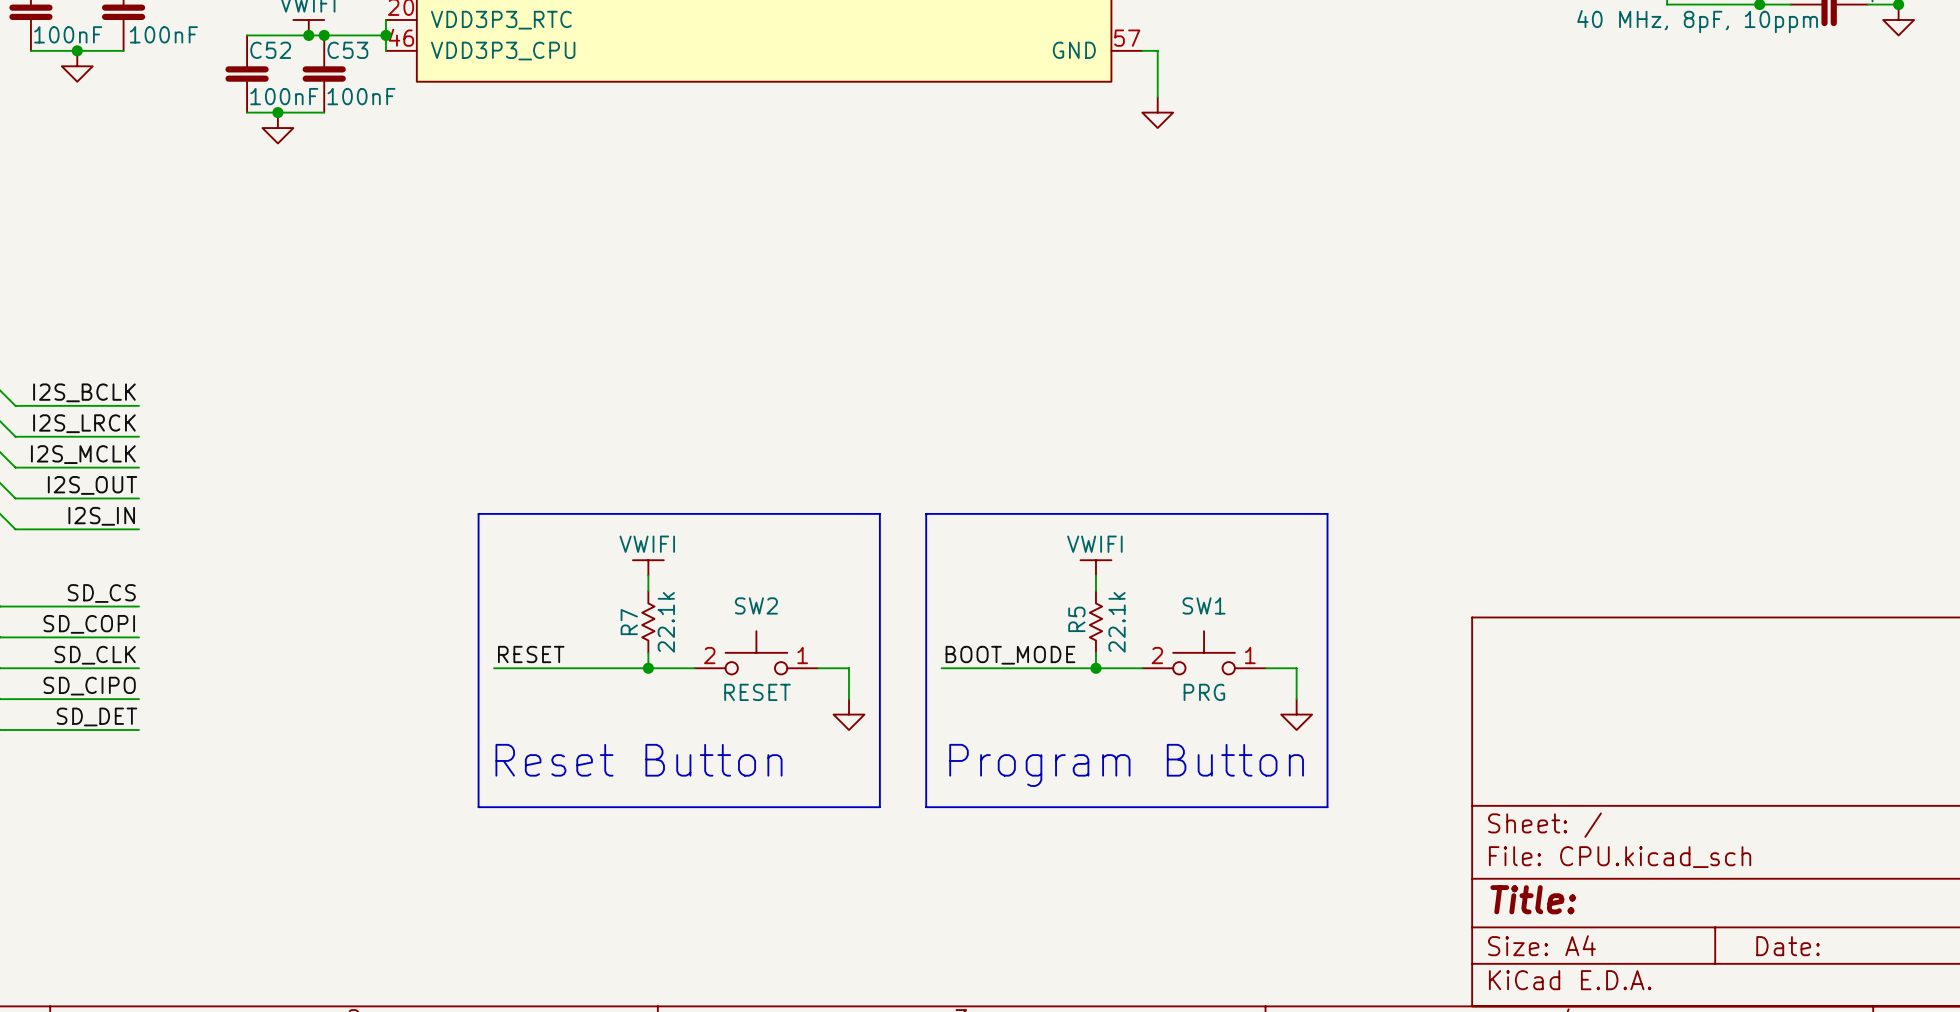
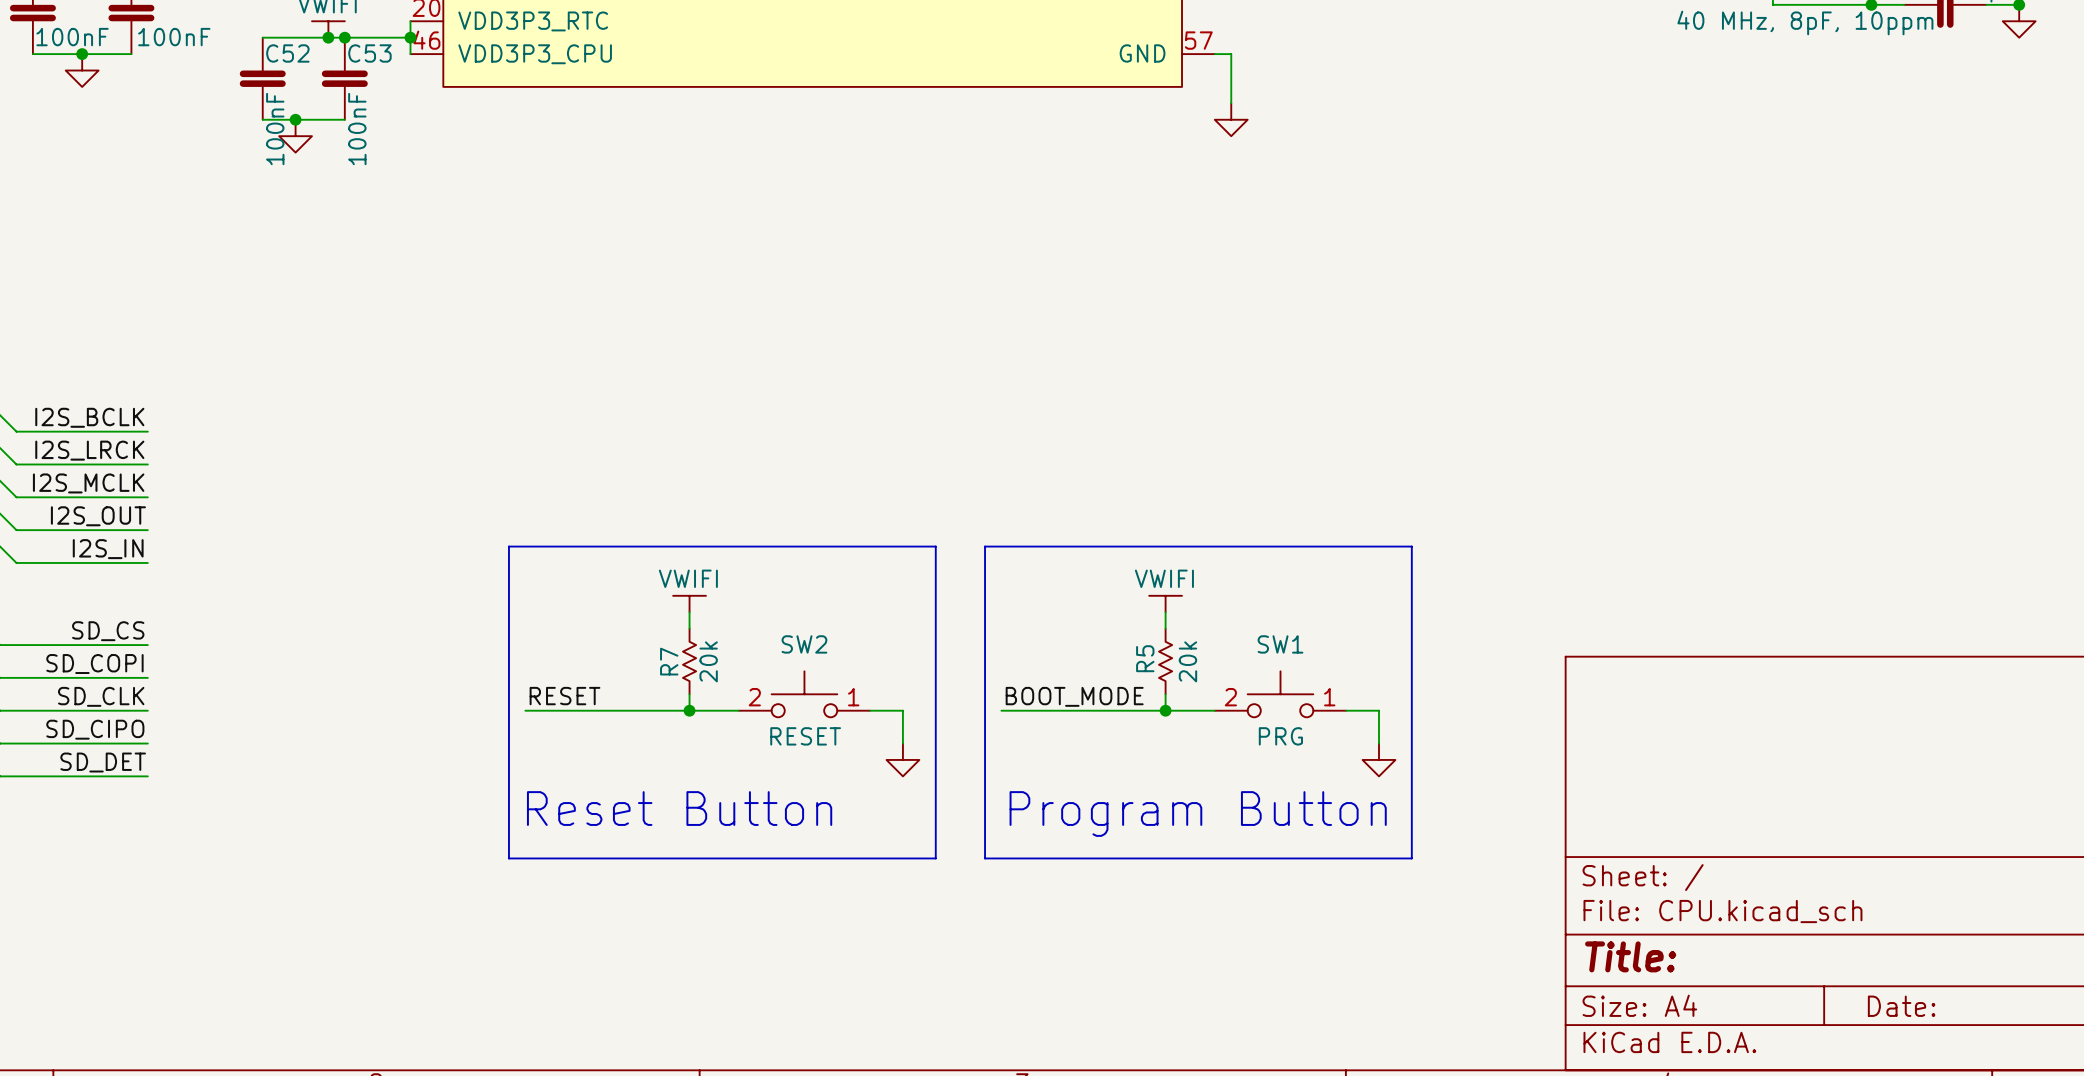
C52 text rotation: 0° (284, 96) -> 90° counterclockwise (275, 129)
C53 text rotation: 0° (361, 96) -> 90° counterclockwise (357, 129)
R7 text: 22.1k (666, 622) -> 20k (708, 661)
R5 text: 22.1k (1117, 622) -> 20k (1187, 661)

